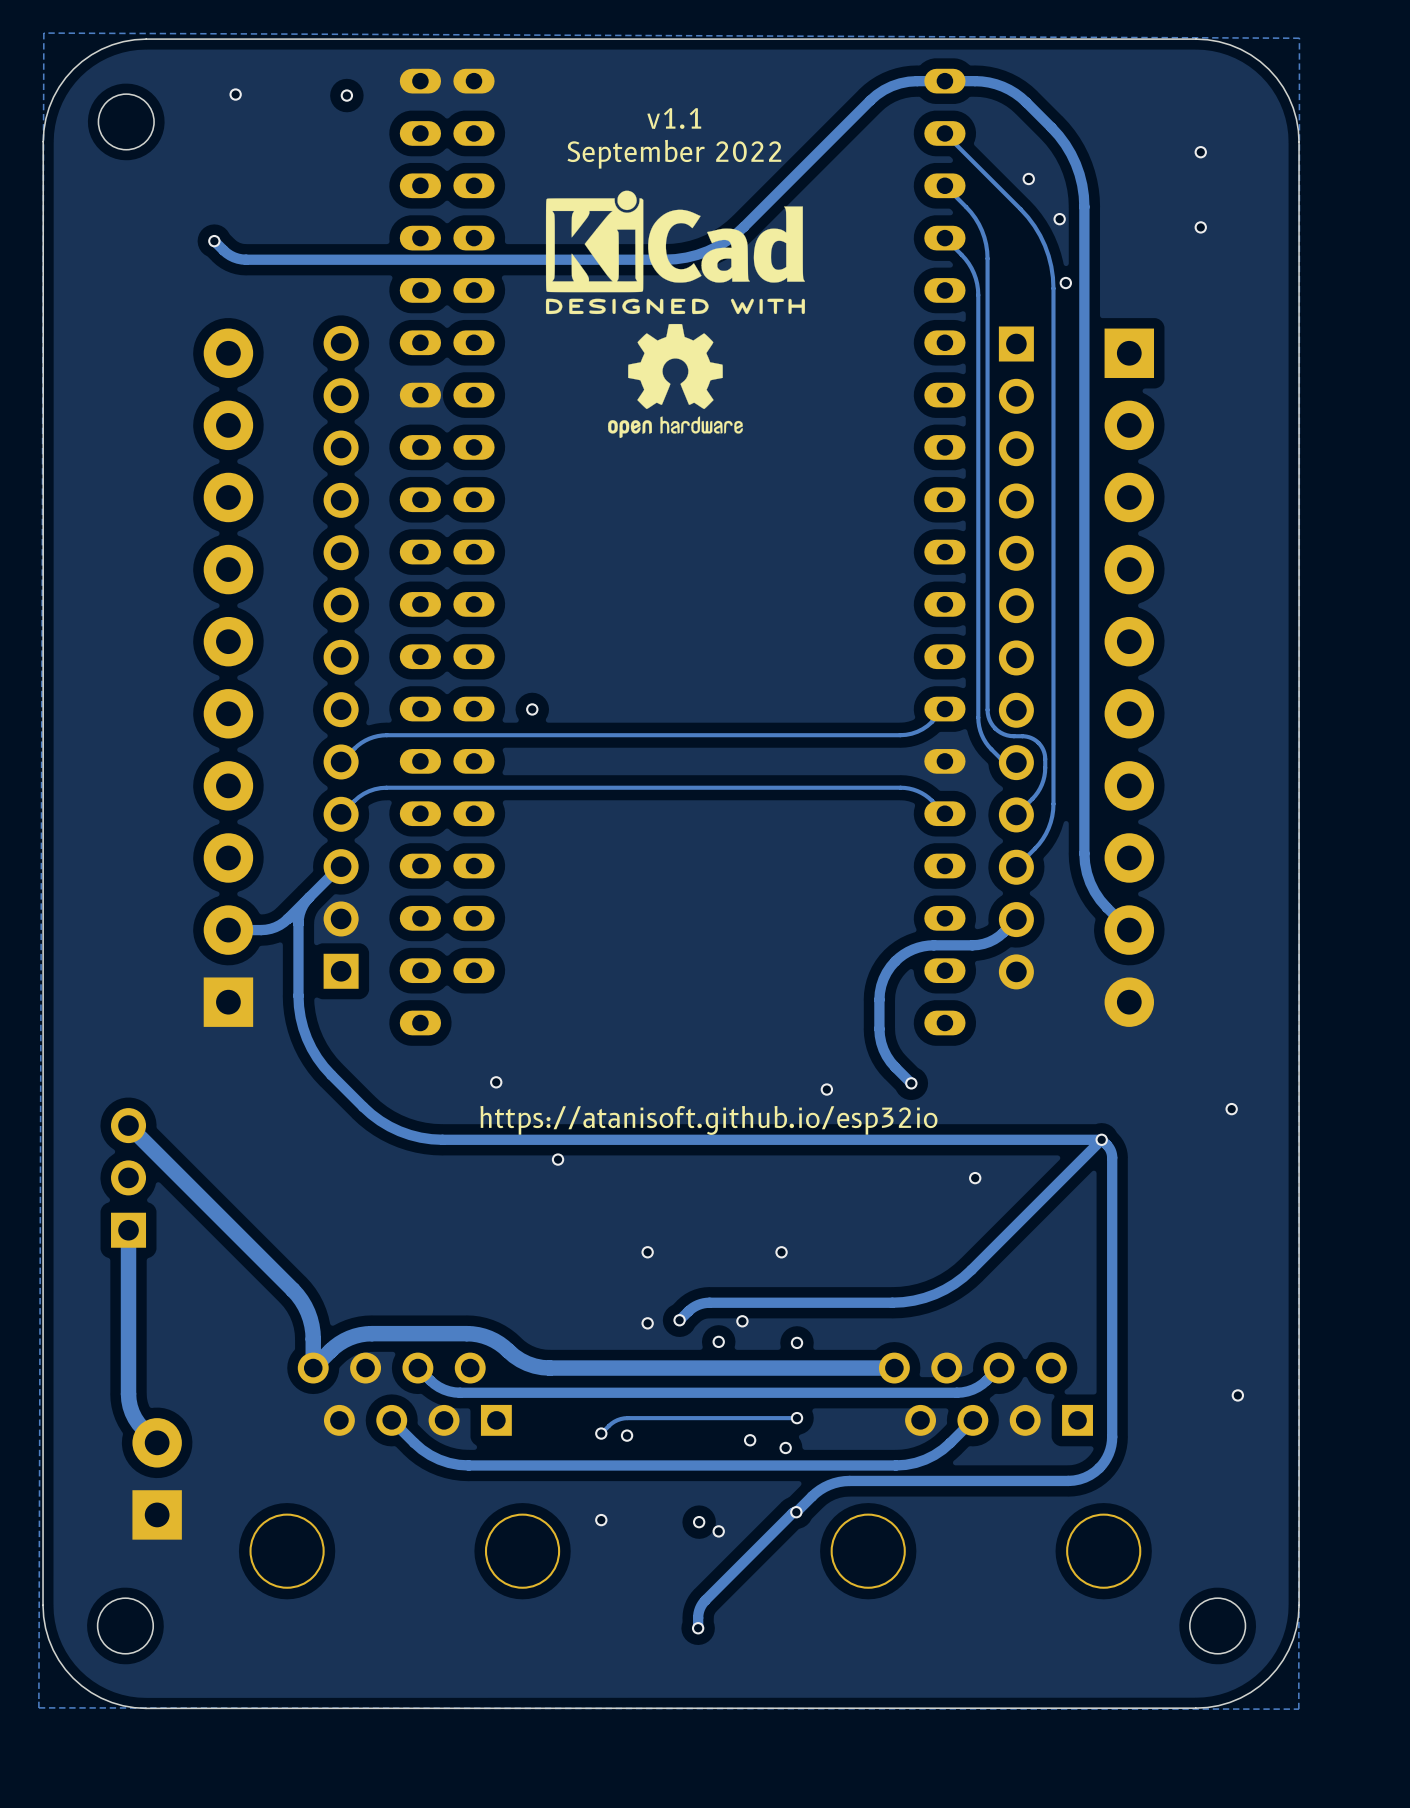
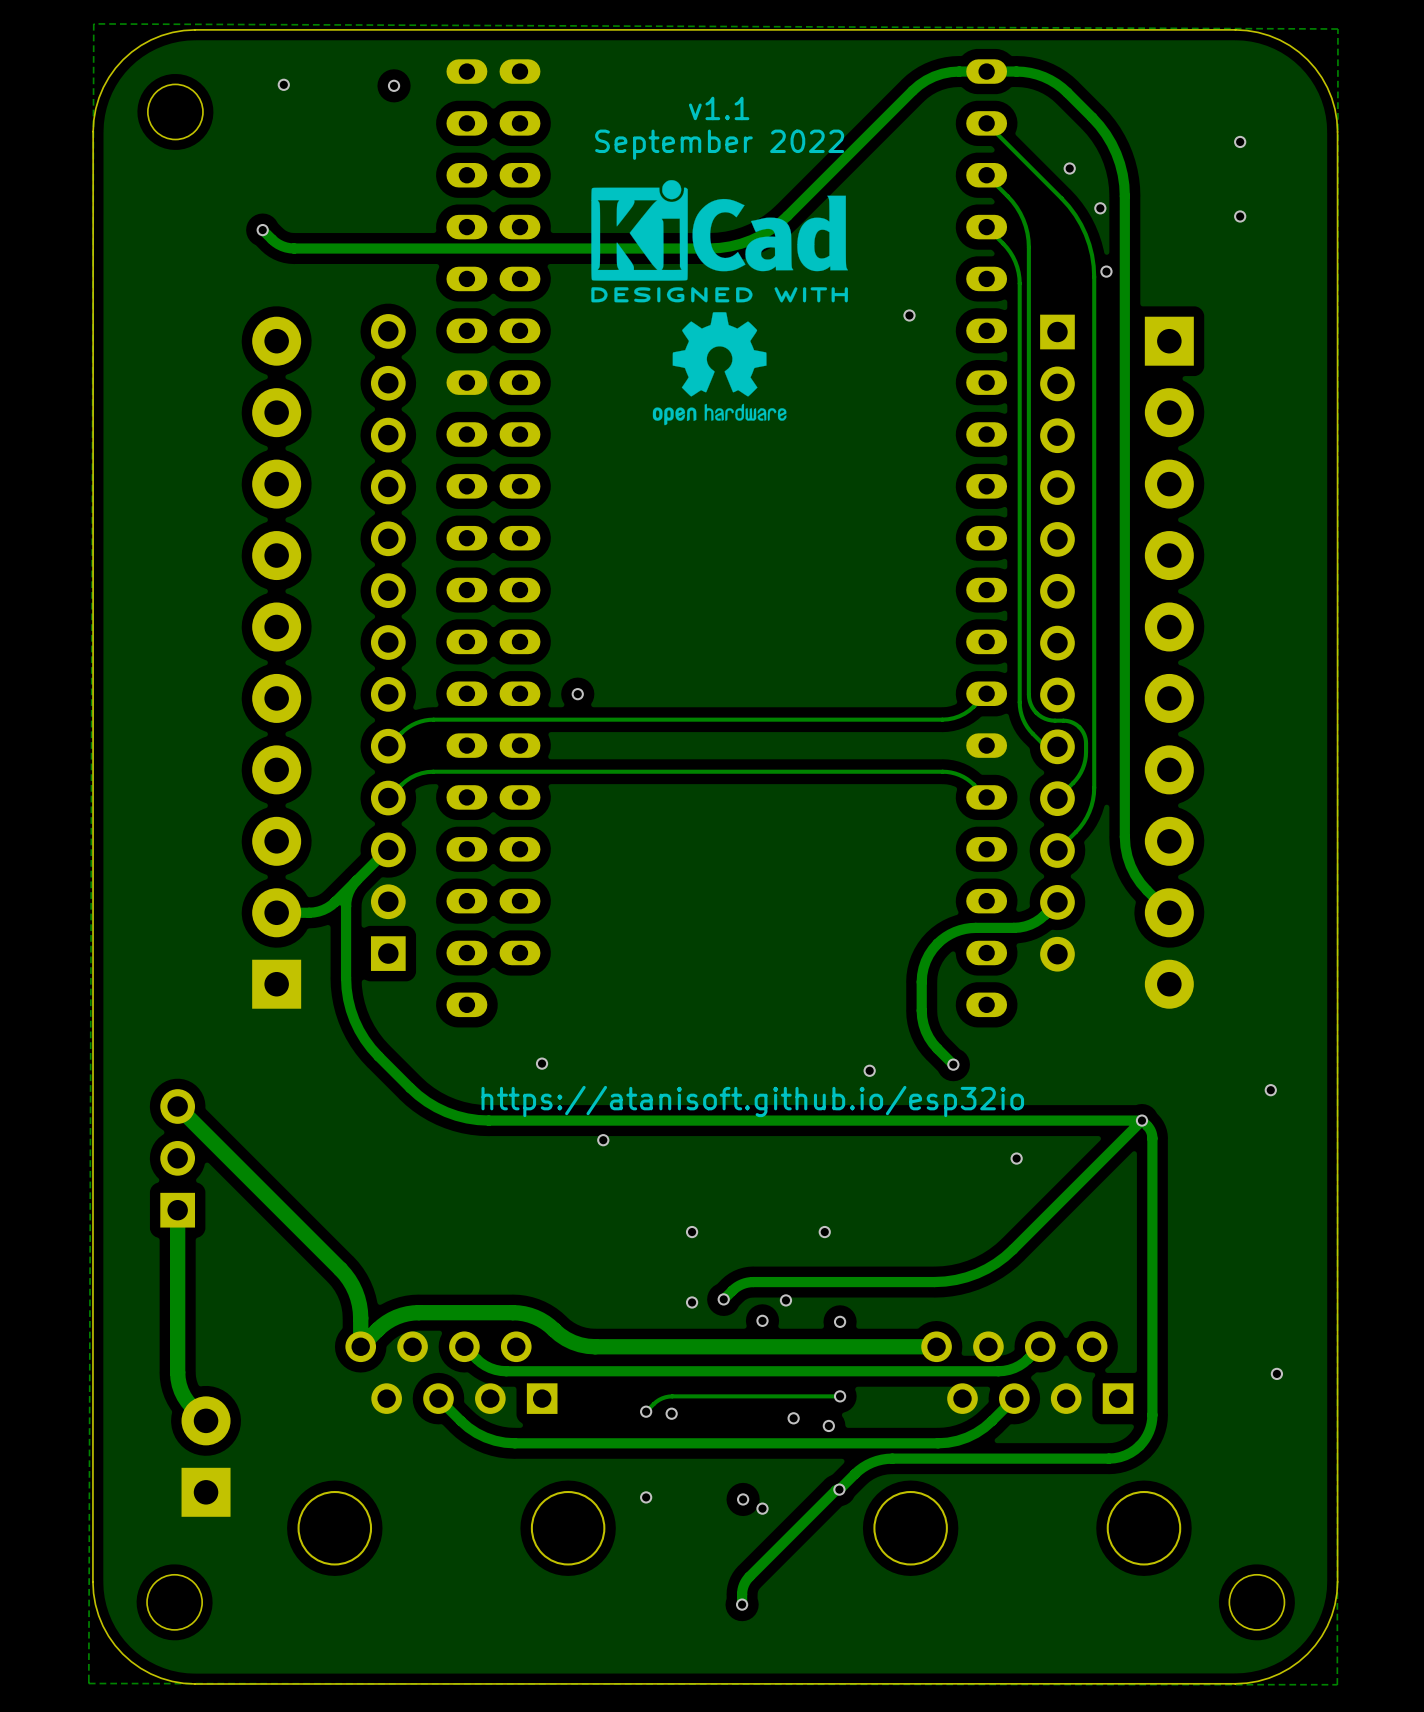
via: none -> (909, 315)

